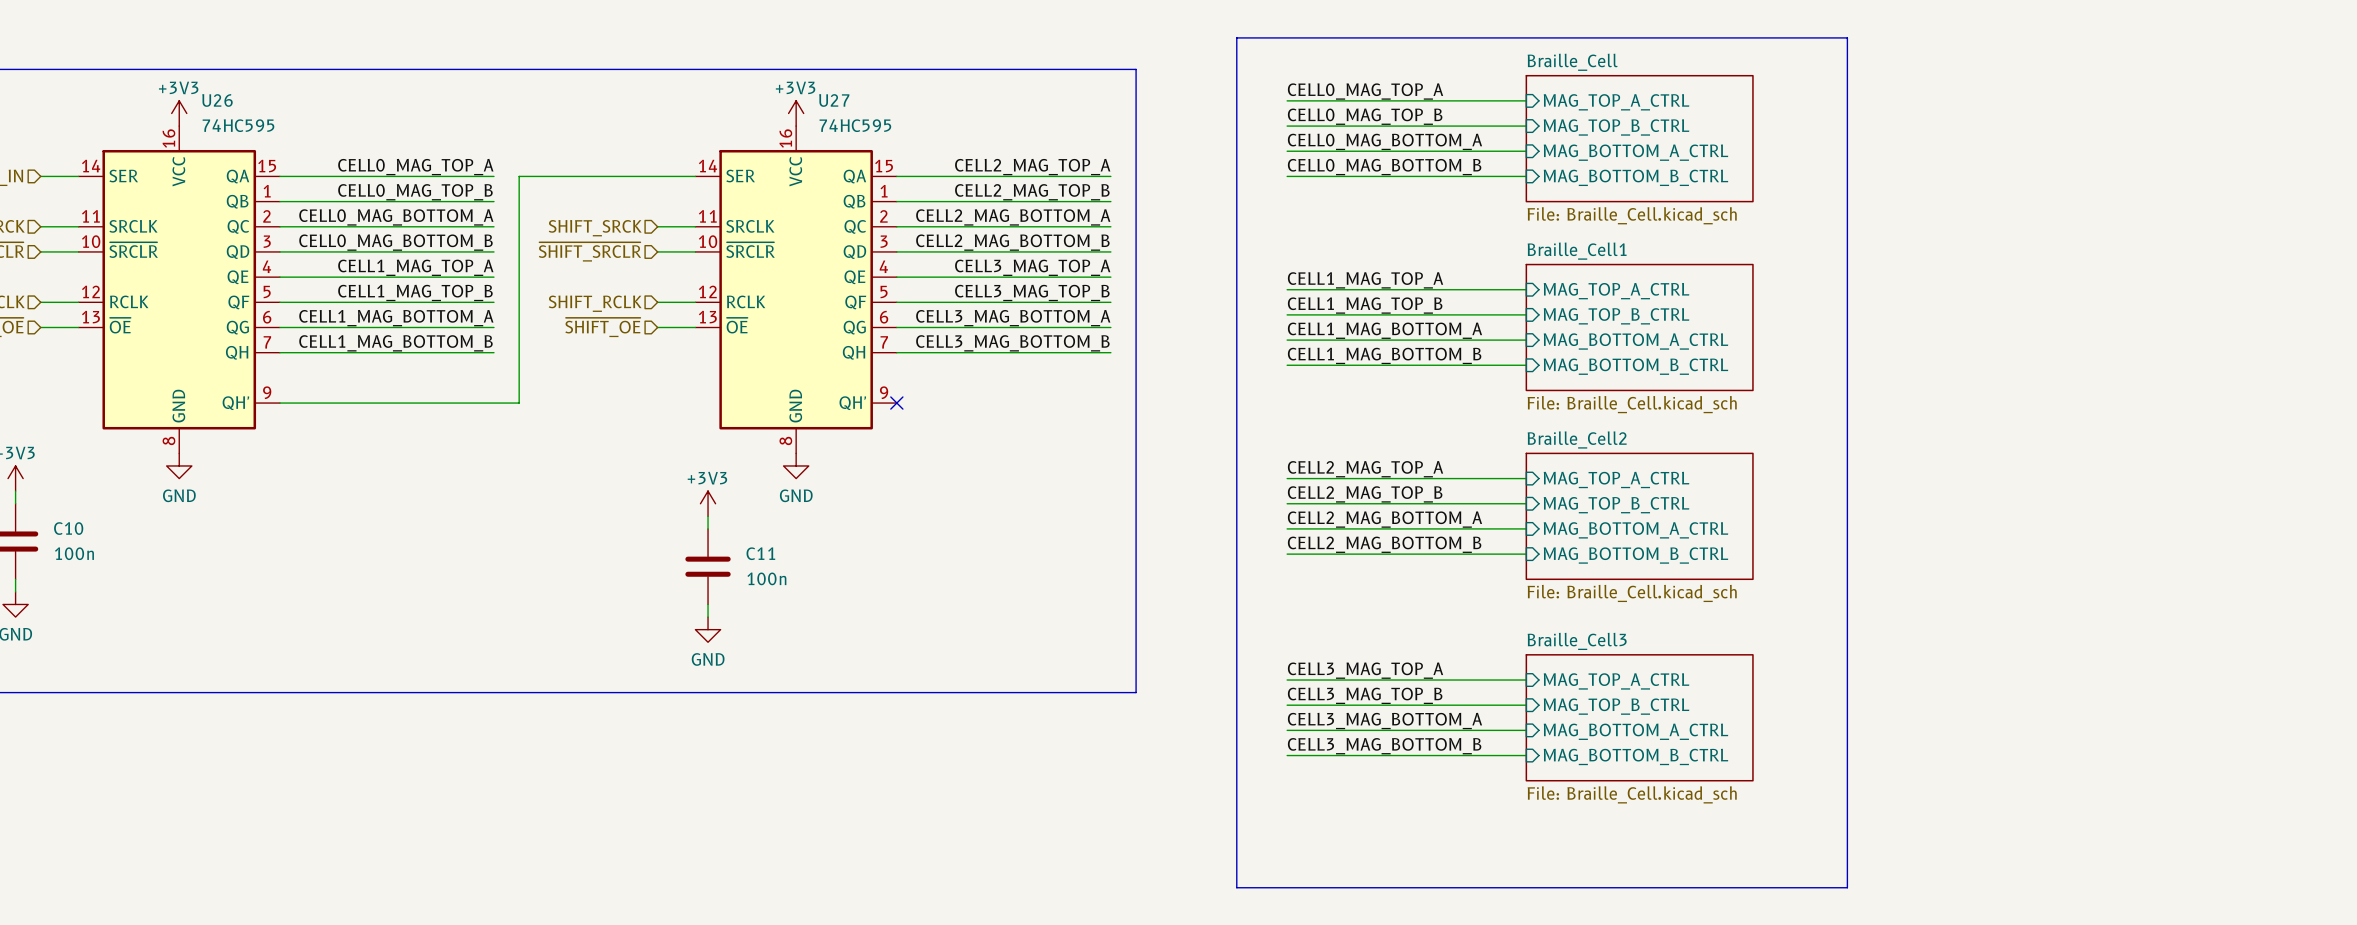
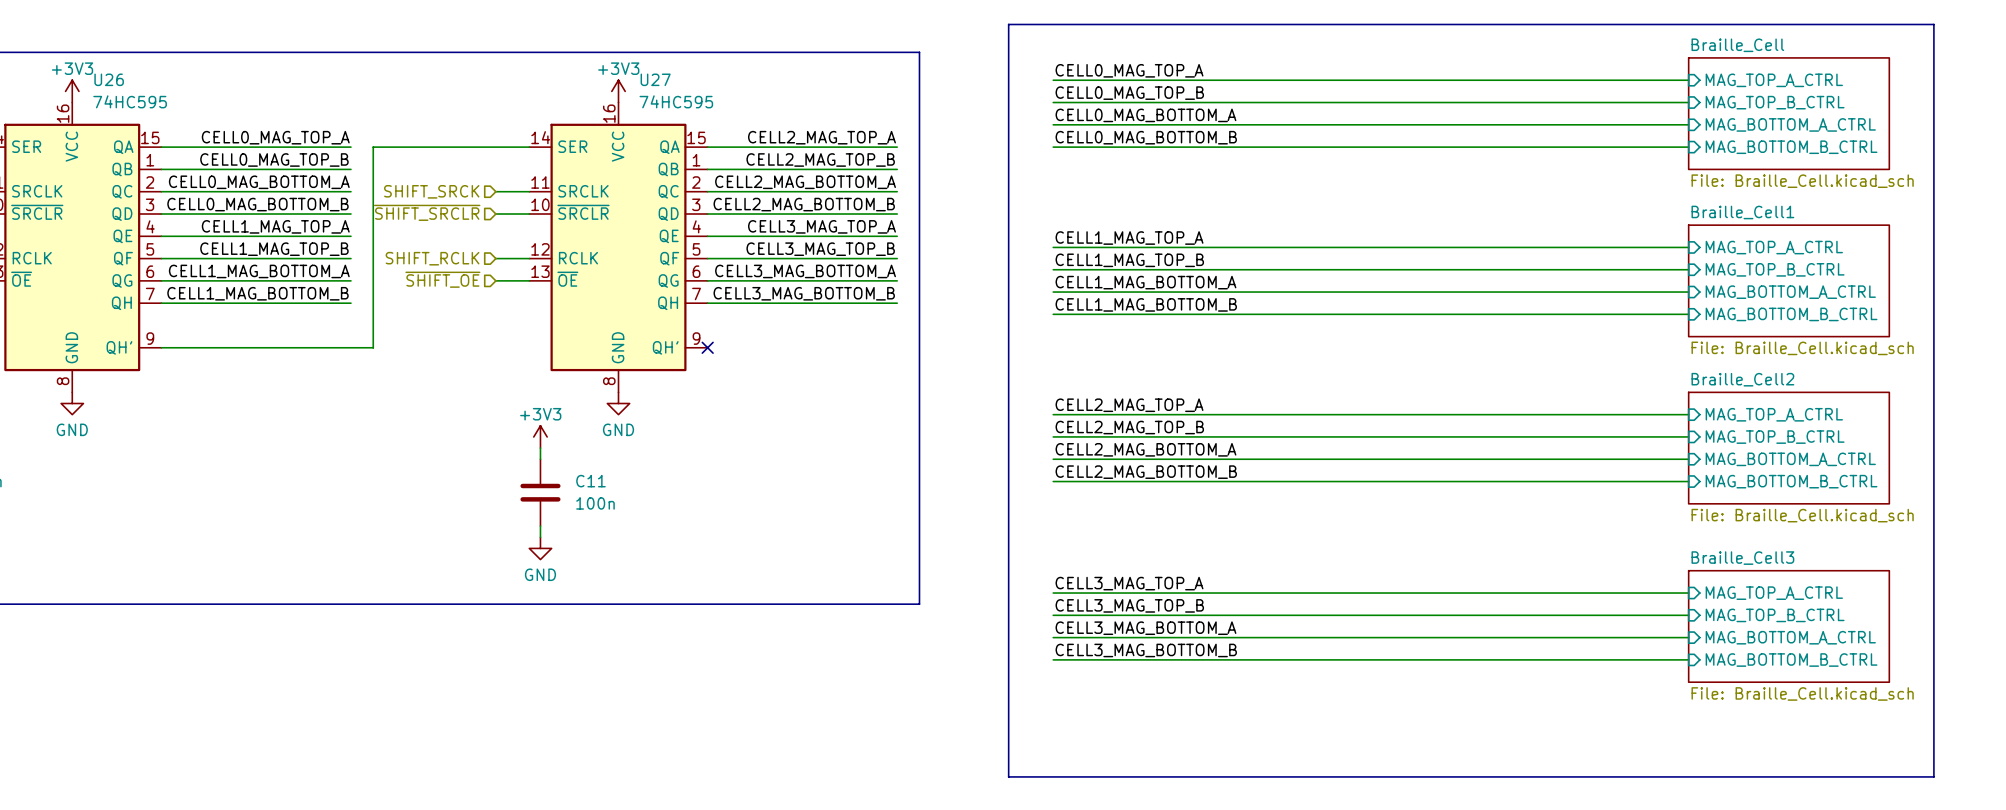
line: (1847, 37) (1847, 887) -> (1549, 24) (1933, 24) (1933, 776) (1549, 776)
wire: none -> (1265, 80) (1688, 80)
sheet pin: MAG_TOP_A_CTRL (1616, 102) -> none
sheet pin: none -> MAG_TOP_A_CTRL (1774, 80)
wire: none -> (1265, 102) (1688, 102)
sheet pin: MAG_TOP_B_CTRL (1616, 127) -> none
sheet pin: none -> MAG_TOP_B_CTRL (1775, 102)
sheet Braille_Cell: File: Braille_Cell.kicad_sch (1639, 138) -> none
sheet Braille_Cell: none -> File: Braille_Cell.kicad_sch (1788, 113)
wire: none -> (1265, 124) (1688, 124)
sheet pin: MAG_BOTTOM_A_CTRL (1635, 152) -> none
sheet pin: none -> MAG_BOTTOM_A_CTRL (1790, 124)
wire: none -> (1265, 147) (1688, 147)
sheet pin: MAG_BOTTOM_B_CTRL (1635, 177) -> none
sheet pin: none -> MAG_BOTTOM_B_CTRL (1791, 147)
wire: none -> (1265, 247) (1688, 247)
sheet pin: MAG_TOP_A_CTRL (1616, 291) -> none
sheet pin: none -> MAG_TOP_A_CTRL (1774, 247)
wire: none -> (1265, 269) (1688, 269)
sheet pin: MAG_TOP_B_CTRL (1616, 316) -> none
sheet pin: none -> MAG_TOP_B_CTRL (1775, 269)
sheet Braille_Cell1 position: (1639, 327) -> (1788, 280)
wire: none -> (1265, 292) (1688, 292)
sheet pin: MAG_BOTTOM_A_CTRL (1635, 341) -> none
sheet pin: none -> MAG_BOTTOM_A_CTRL (1790, 292)
wire: none -> (1265, 314) (1688, 314)
sheet pin: MAG_BOTTOM_B_CTRL (1635, 366) -> none
sheet pin: none -> MAG_BOTTOM_B_CTRL (1791, 314)
wire: none -> (1265, 414) (1688, 414)
sheet pin: MAG_TOP_A_CTRL (1616, 479) -> none
sheet pin: none -> MAG_TOP_A_CTRL (1774, 414)
wire: none -> (1265, 436) (1688, 436)
sheet pin: MAG_TOP_B_CTRL (1616, 505) -> none
sheet pin: none -> MAG_TOP_B_CTRL (1775, 437)
sheet Braille_Cell2 position: (1639, 516) -> (1788, 448)
wire: none -> (1265, 459) (1688, 459)
sheet pin: MAG_BOTTOM_A_CTRL (1635, 530) -> none
sheet pin: none -> MAG_BOTTOM_A_CTRL (1790, 459)
wire: none -> (1265, 481) (1688, 481)
sheet pin: MAG_BOTTOM_B_CTRL (1635, 555) -> none
sheet pin: none -> MAG_BOTTOM_B_CTRL (1791, 481)
wire: none -> (1265, 593) (1688, 593)
sheet pin: MAG_TOP_A_CTRL (1616, 681) -> none
sheet pin: none -> MAG_TOP_A_CTRL (1774, 593)
wire: none -> (1265, 615) (1688, 615)
sheet pin: MAG_TOP_B_CTRL (1616, 706) -> none
sheet pin: none -> MAG_TOP_B_CTRL (1775, 615)
sheet Braille_Cell3 position: (1639, 717) -> (1788, 626)
wire: none -> (1265, 637) (1688, 637)
sheet pin: MAG_BOTTOM_A_CTRL (1635, 731) -> none
sheet pin: none -> MAG_BOTTOM_A_CTRL (1790, 637)
wire: none -> (1265, 659) (1688, 659)
sheet pin: MAG_BOTTOM_B_CTRL (1635, 756) -> none
sheet pin: none -> MAG_BOTTOM_B_CTRL (1791, 660)

